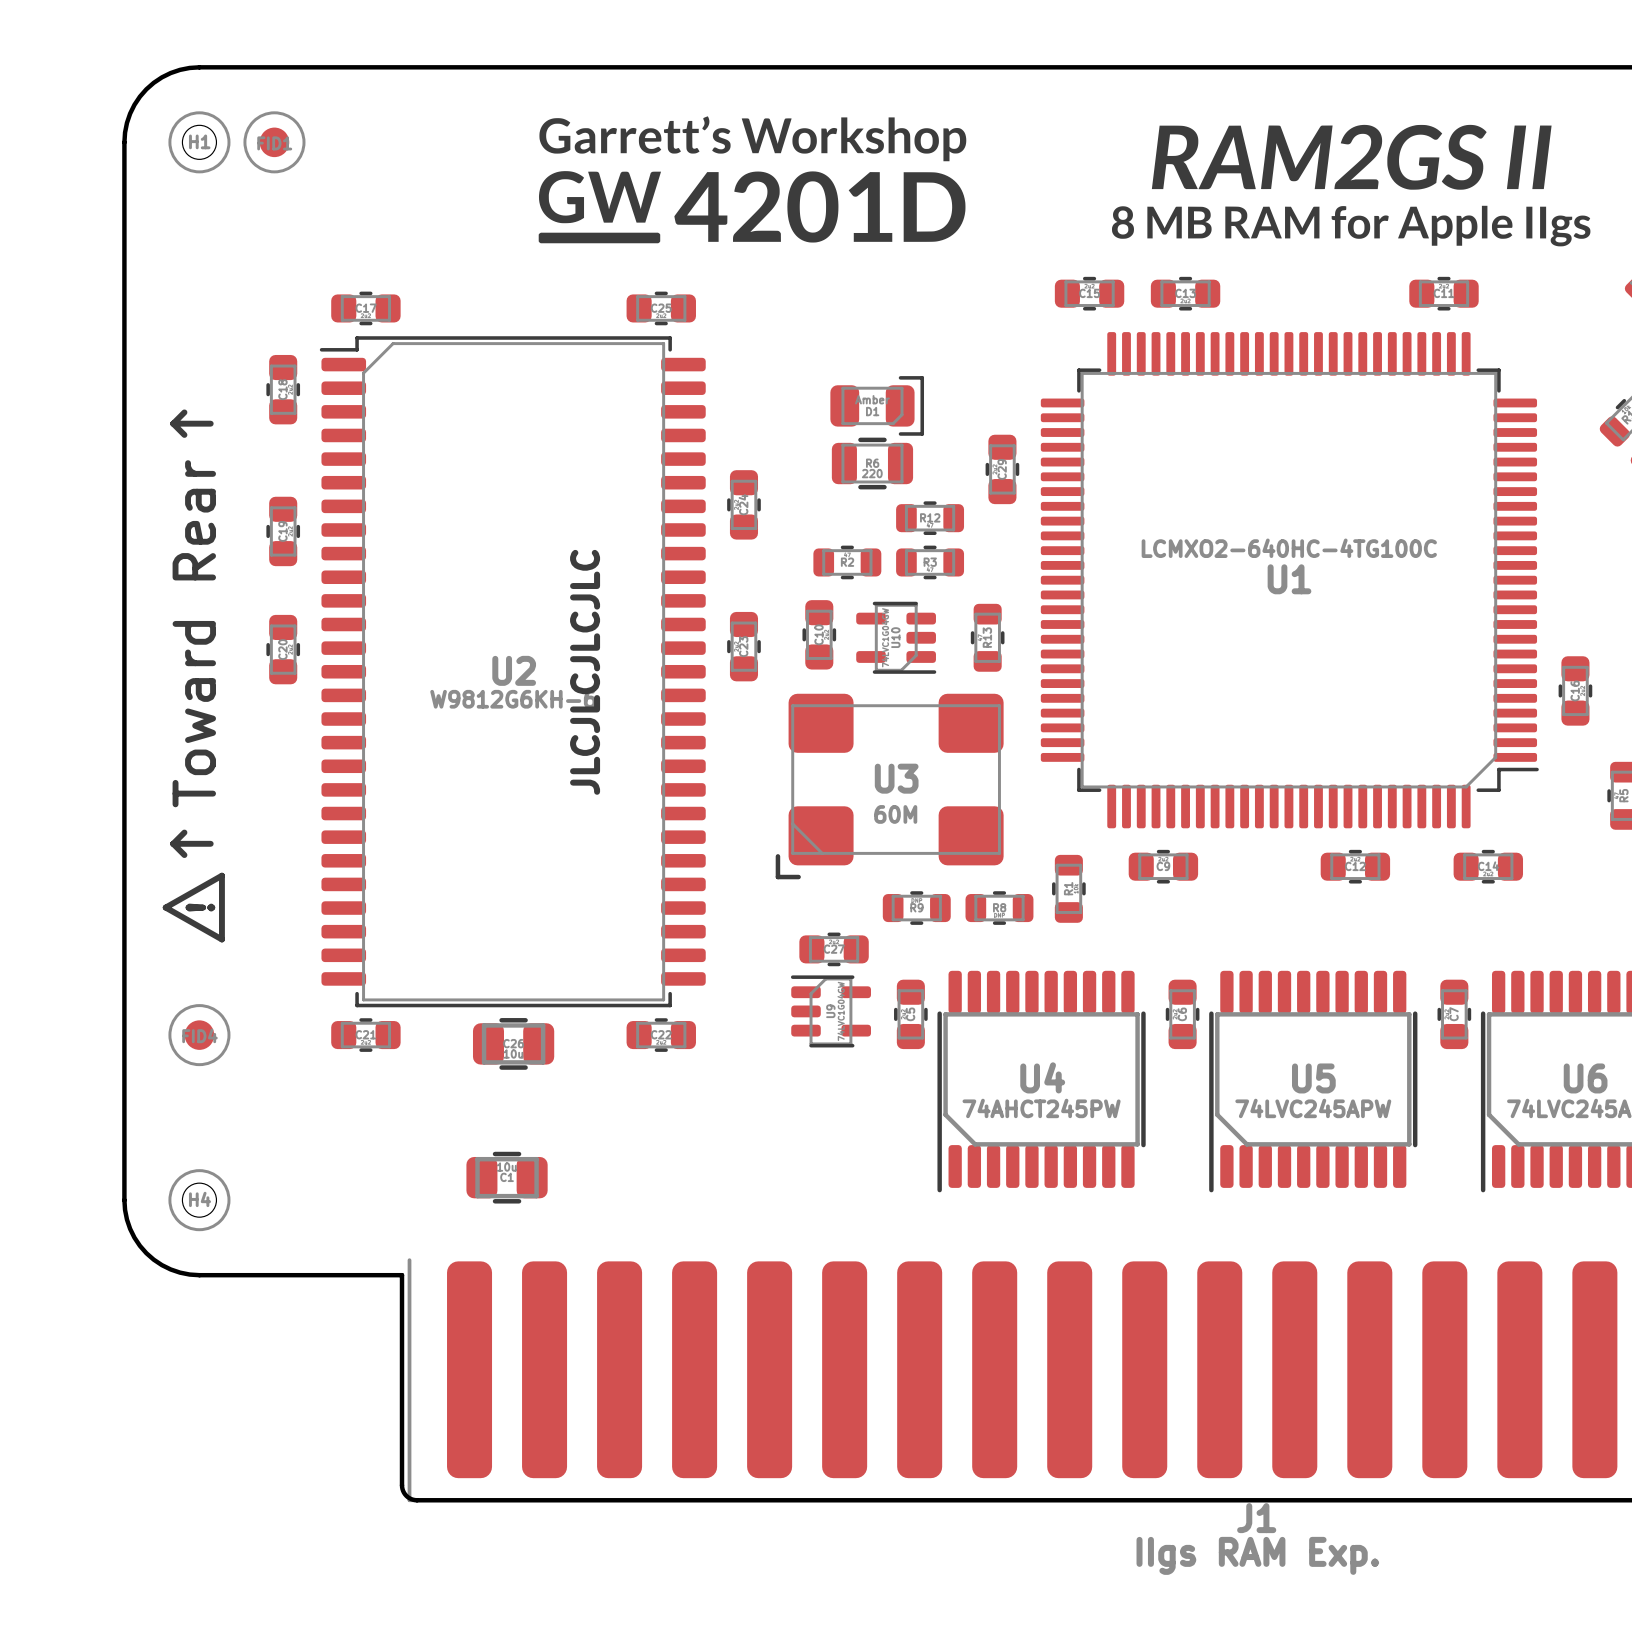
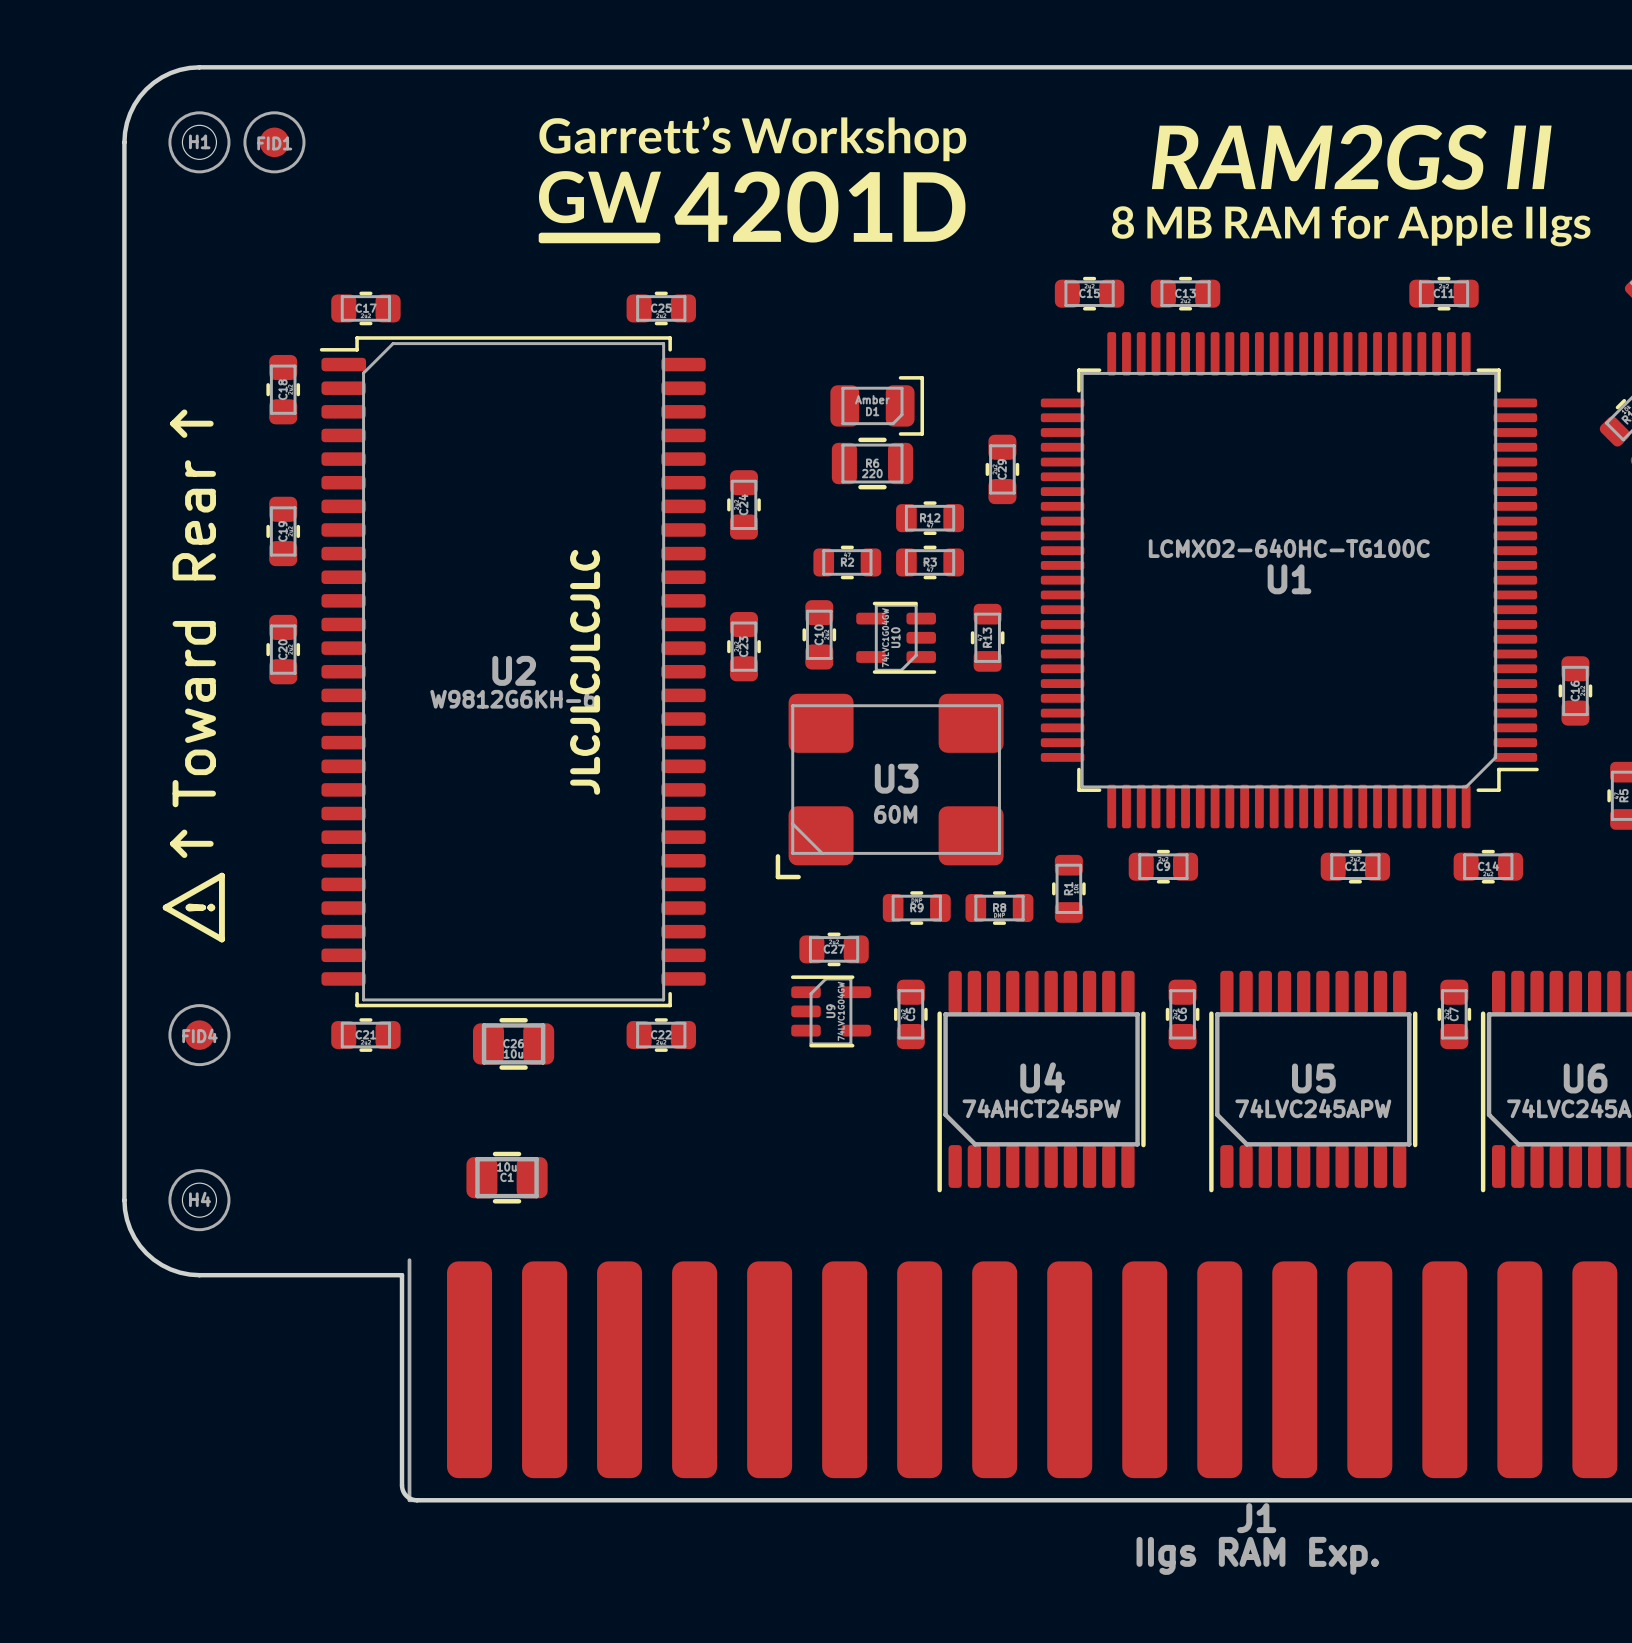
U1 value: LCMXO2-640HC-4TG100C (1289, 548) -> LCMXO2-640HC-TG100C (1289, 548)

